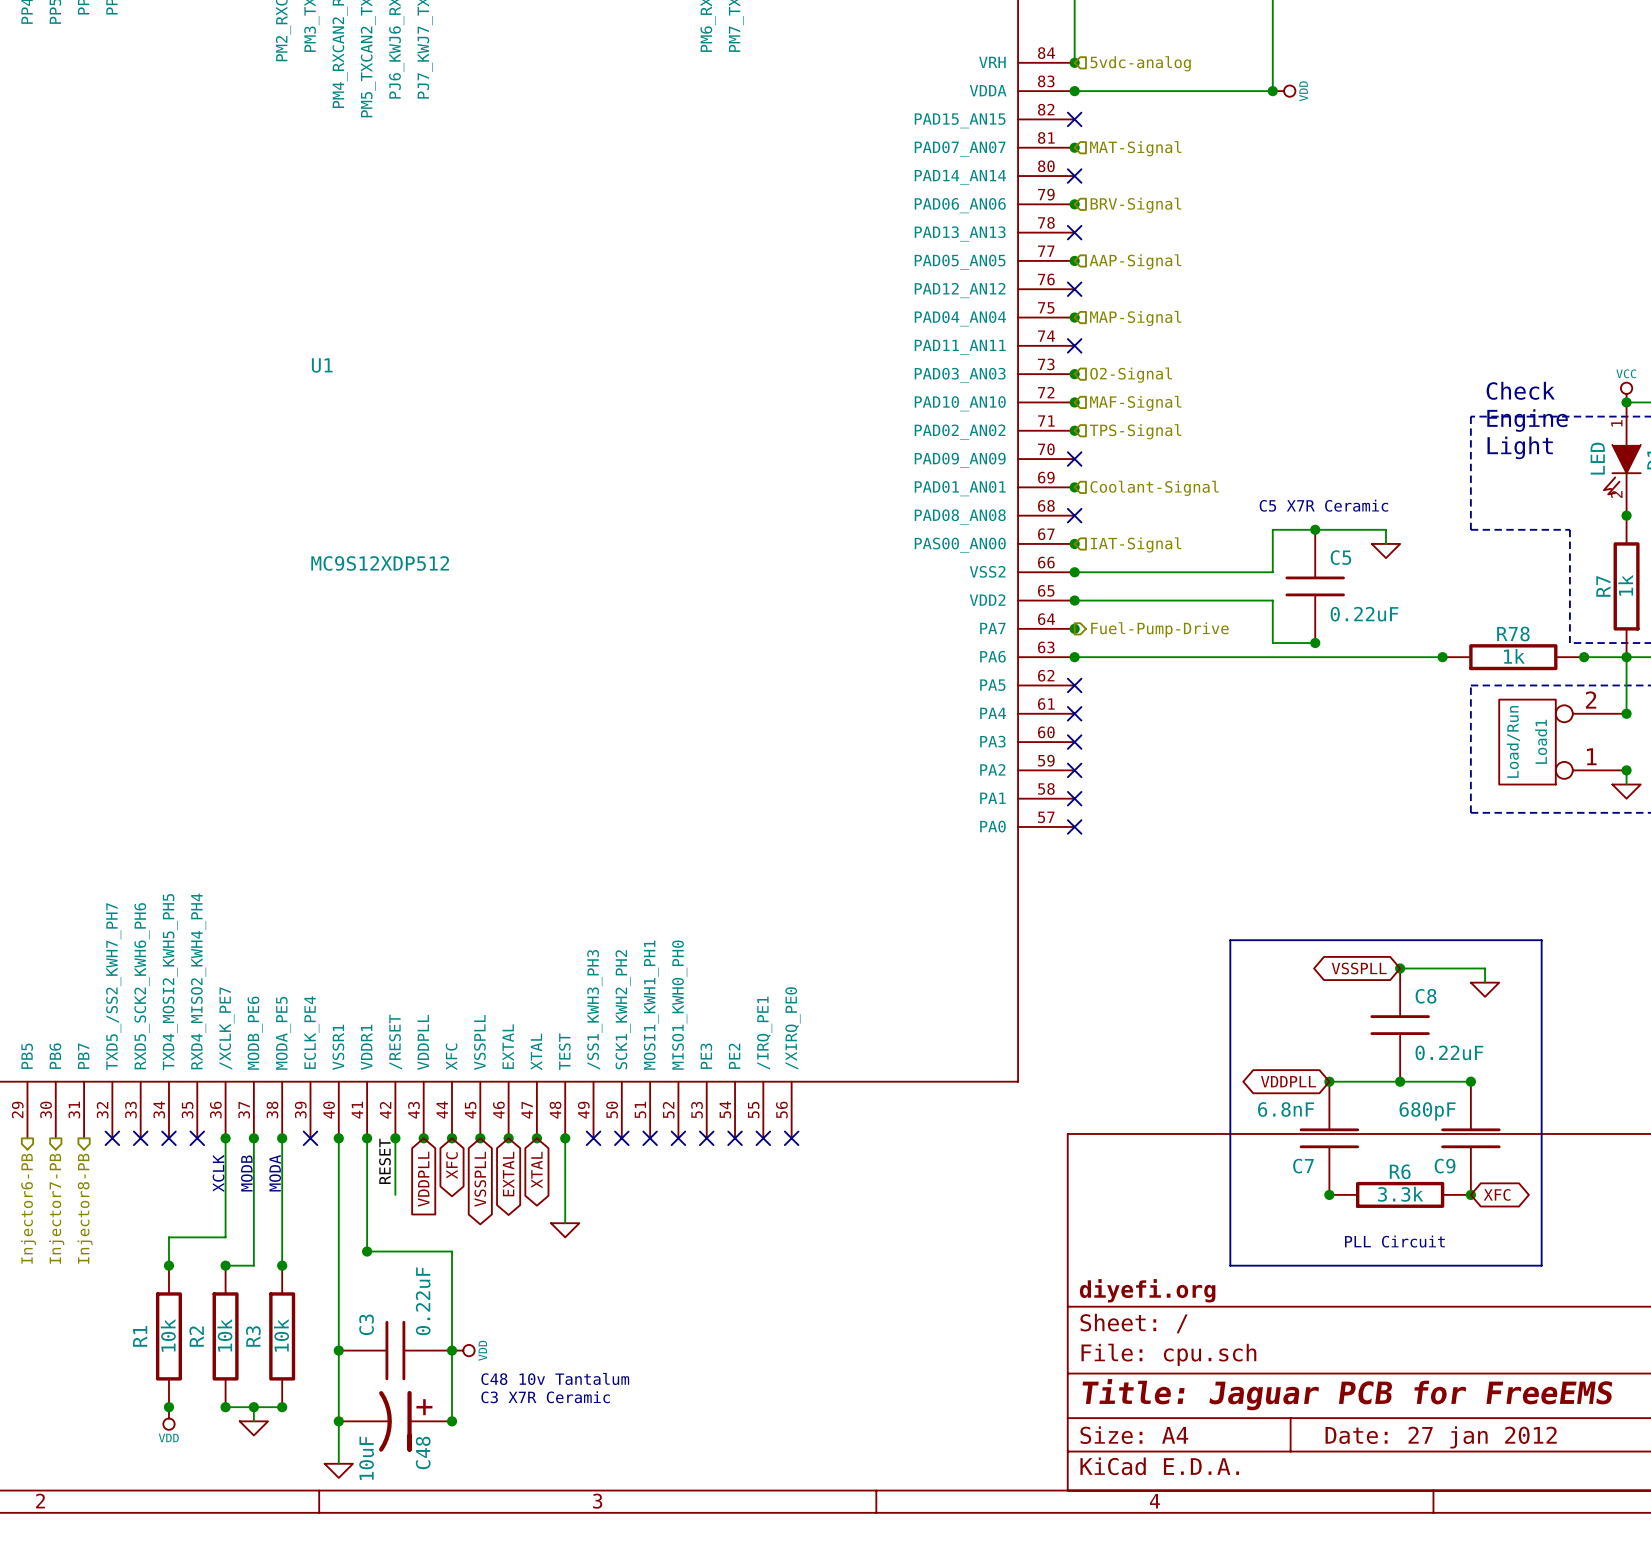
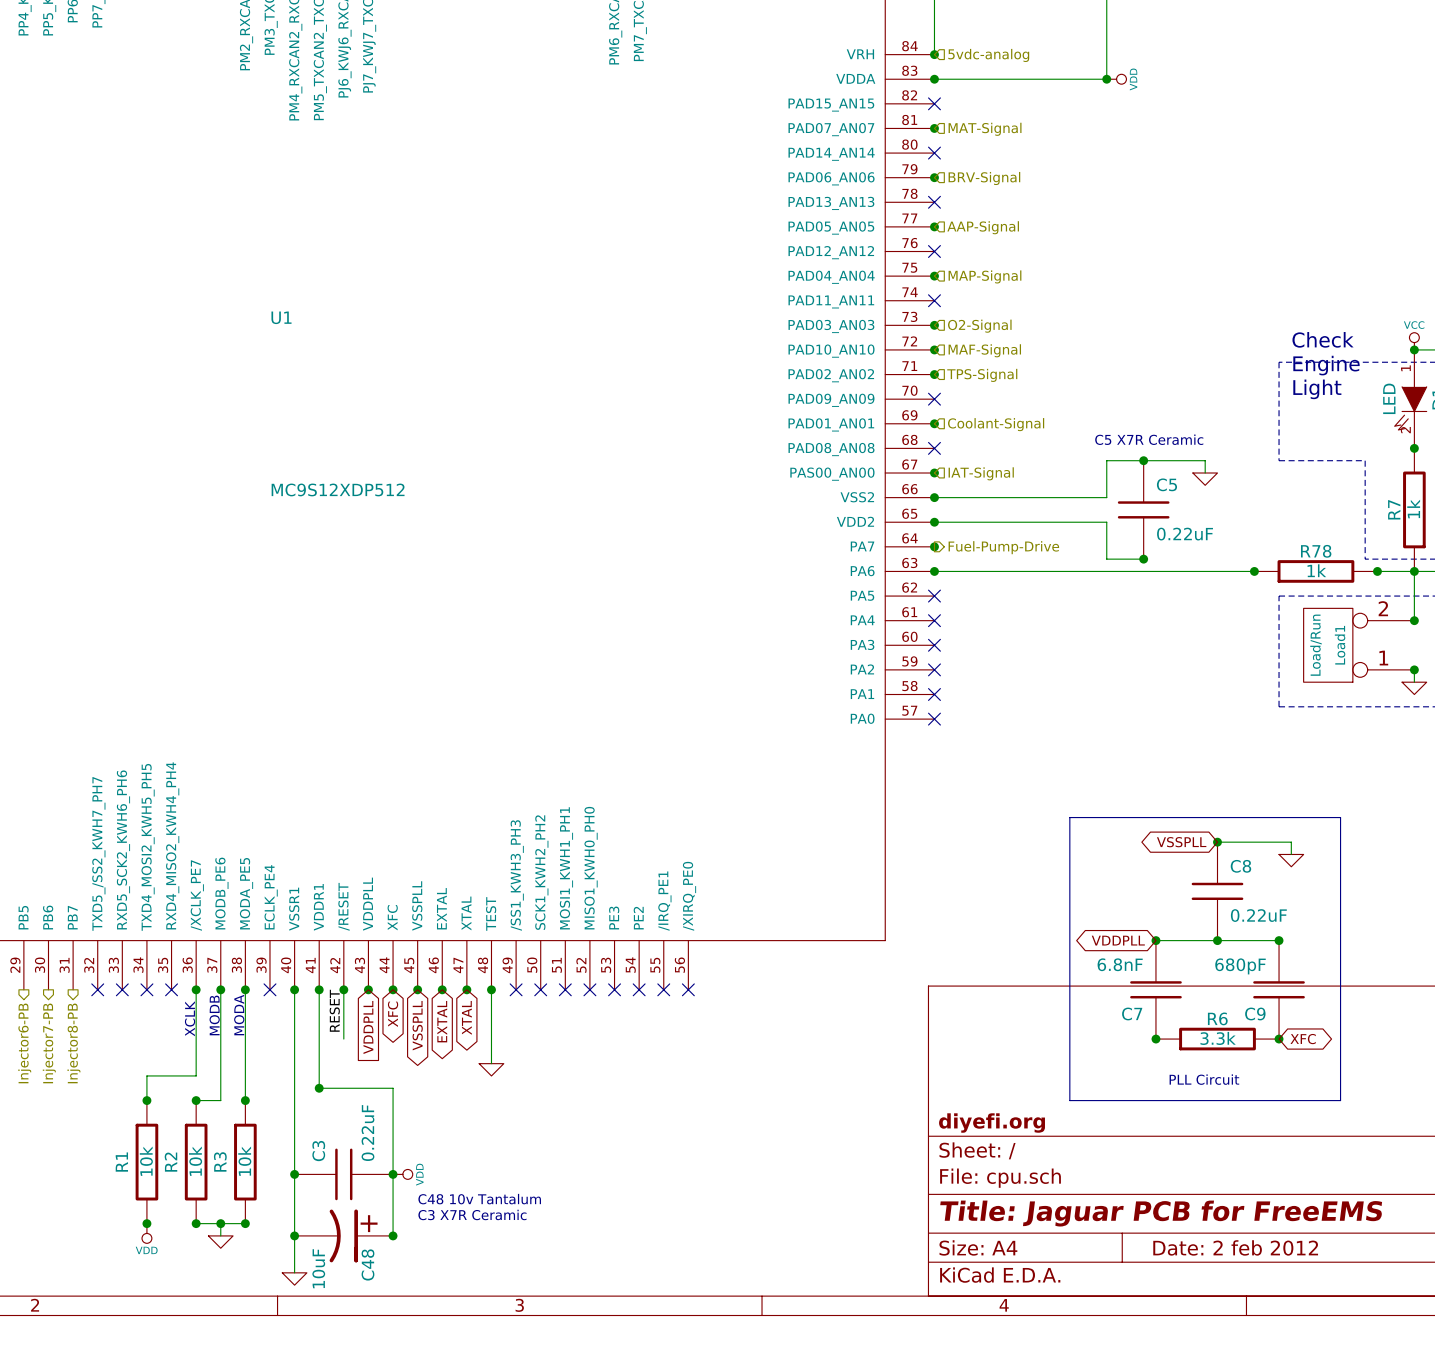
title block: Date: 27 jan 2012 (1441, 1437) -> Date: 2 feb 2012 (1235, 1247)

